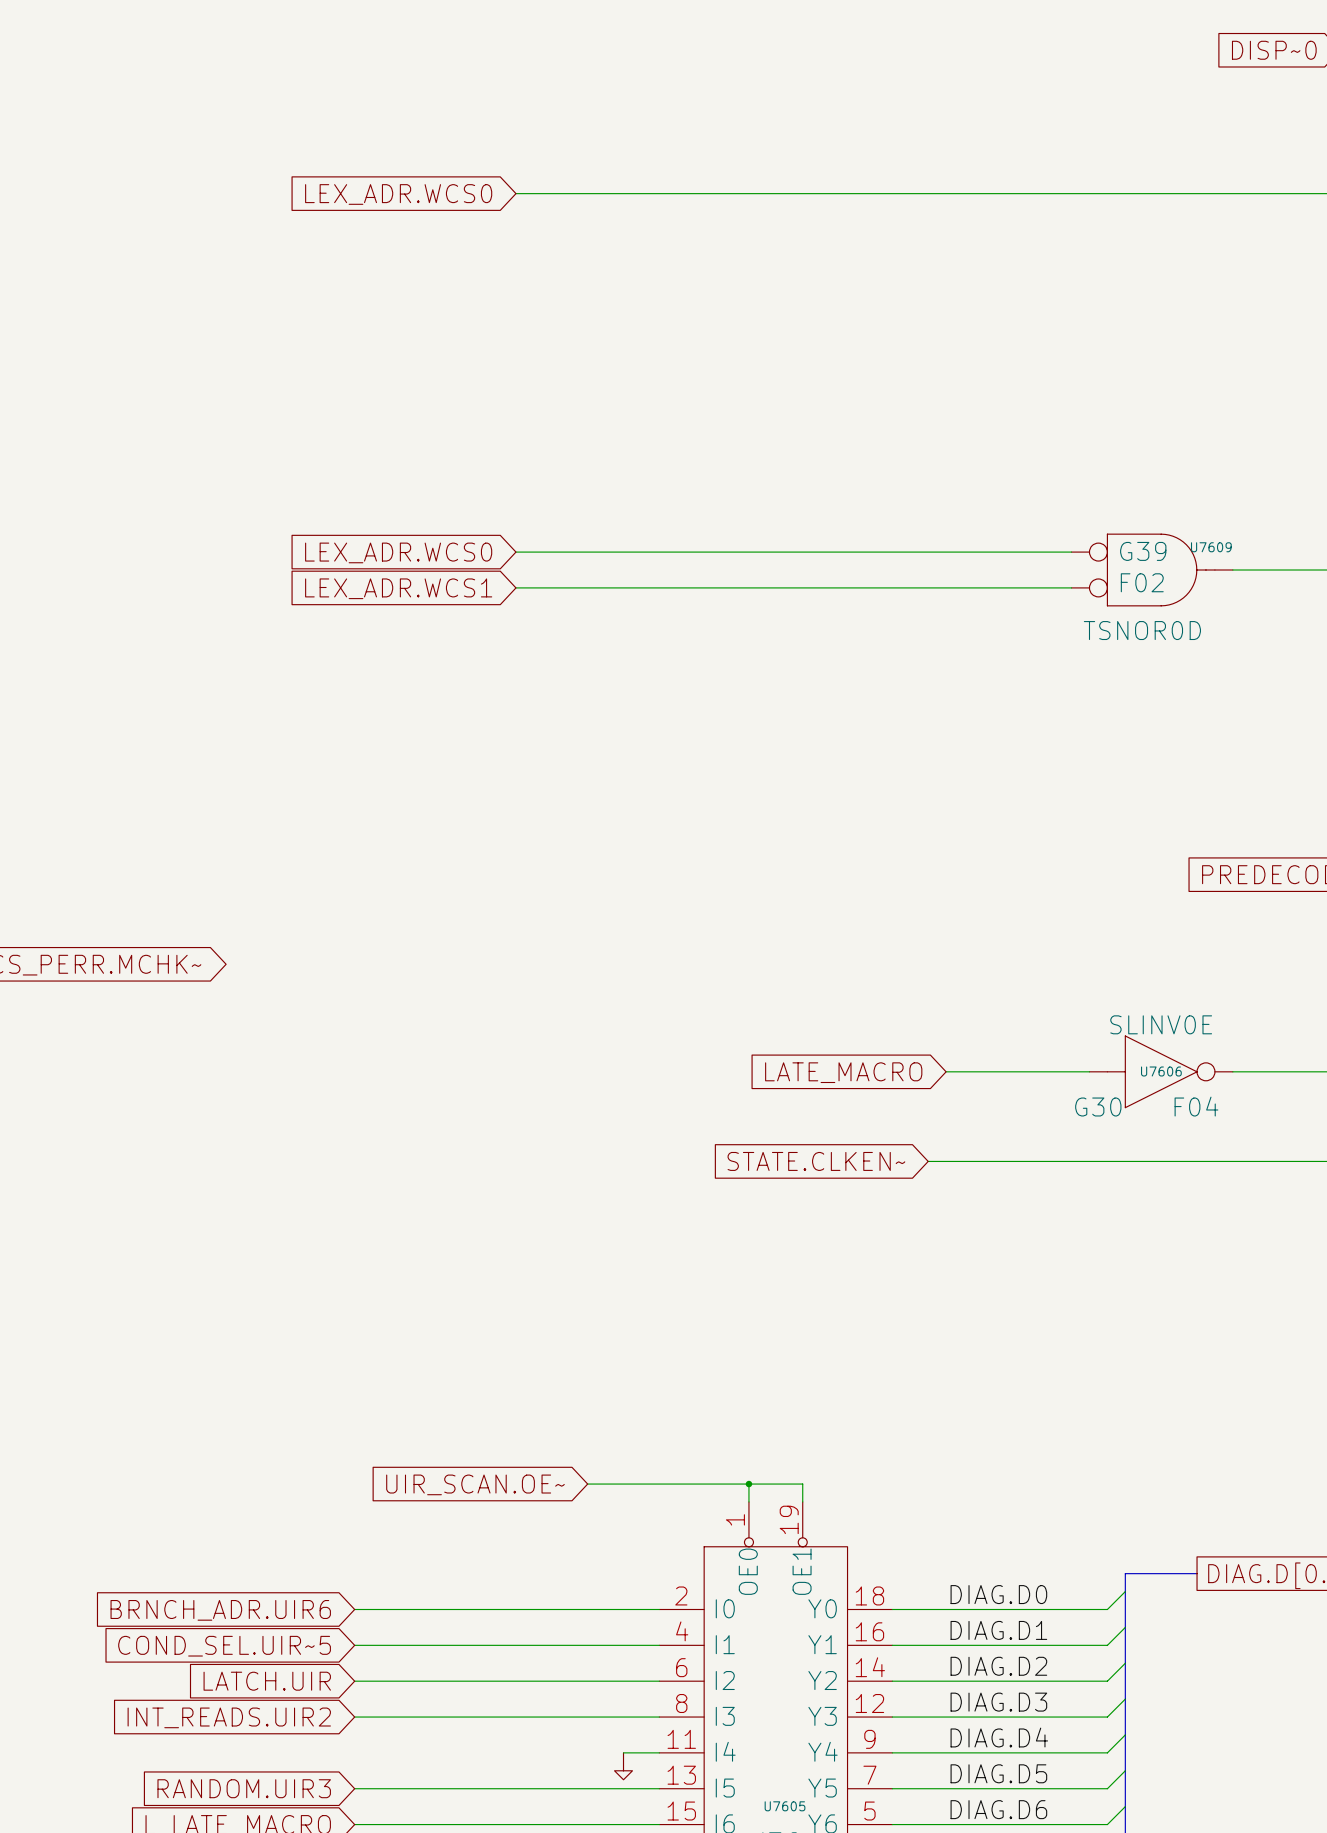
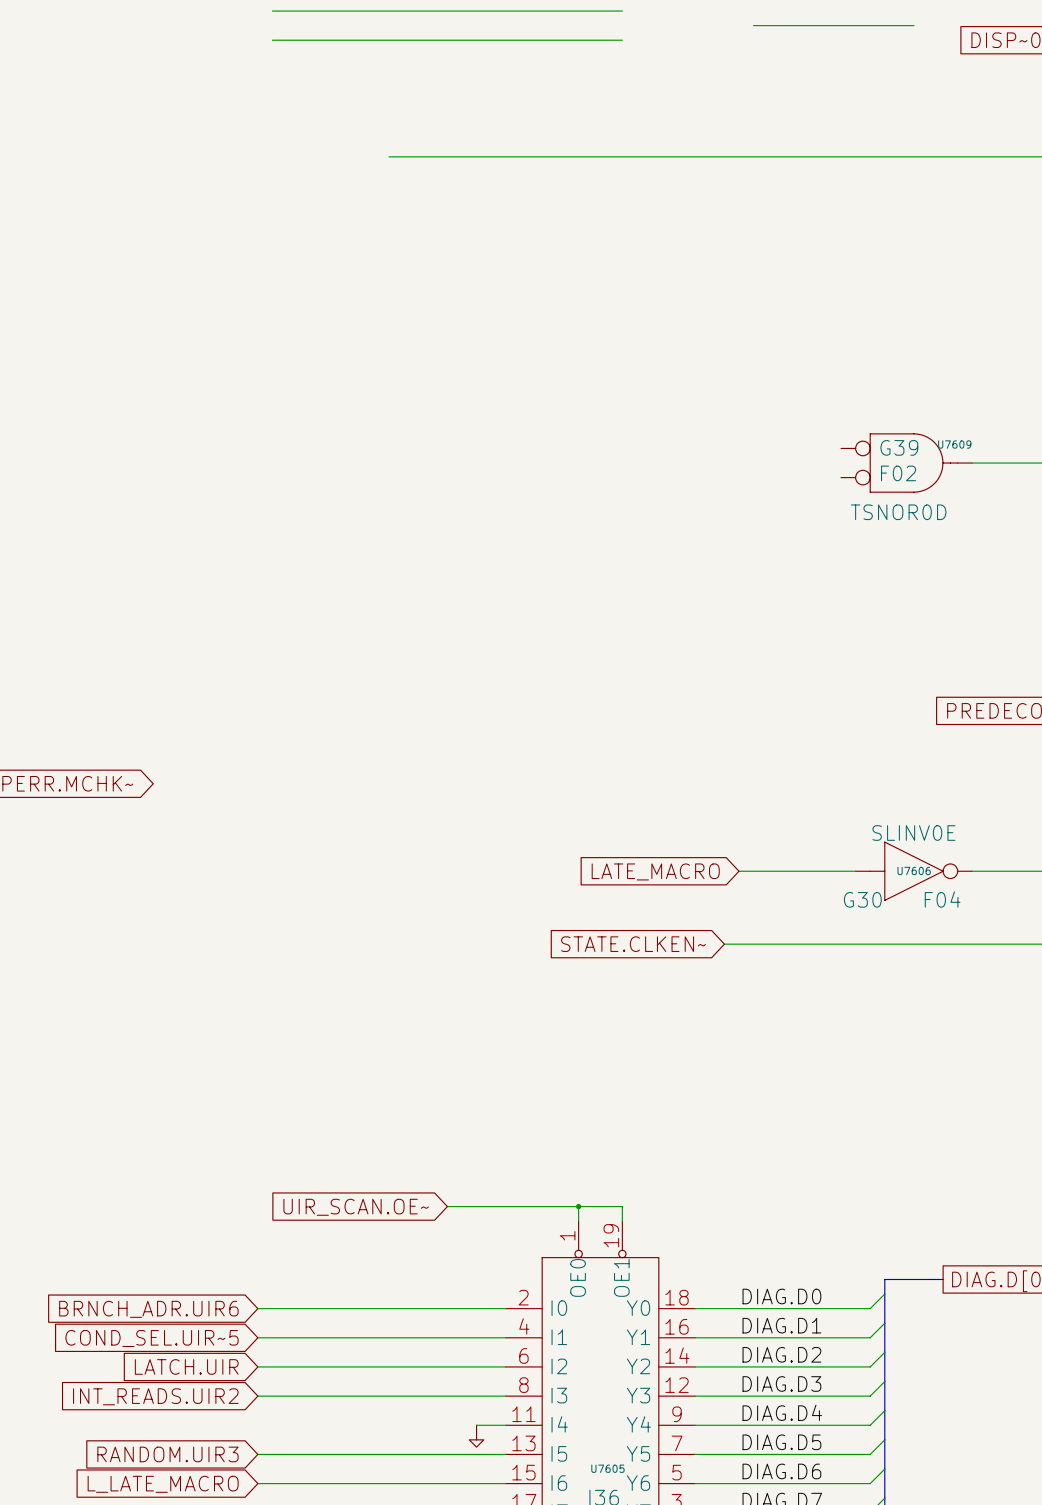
wire: none -> (272, 11) (622, 11)
wire: none -> (753, 25) (913, 25)
wire: none -> (272, 40) (622, 40)
global label: LEX_ADR.WCS0 (398, 194) -> none
global label: LEX_ADR.WCS0 (398, 552) -> none
wire: (515, 552) (1071, 552) -> none
wire: (515, 587) (1071, 587) -> none
global label: LEX_ADR.WCS1 (398, 588) -> none

